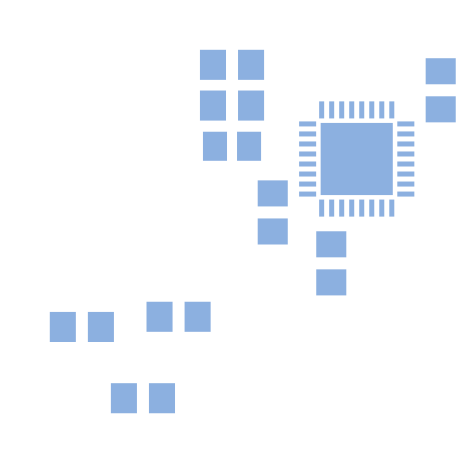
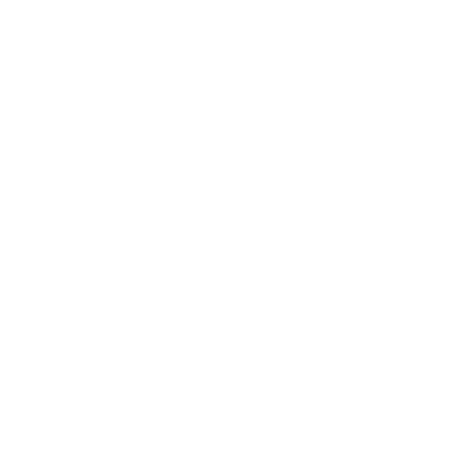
part: (232, 64) -> none
part: (440, 90) -> none
part: (232, 105) -> none
part: (232, 146) -> none
part: (356, 158) -> none
part: (272, 212) -> none
part: (331, 263) -> none
part: (178, 316) -> none
part: (81, 326) -> none
part: (142, 398) -> none

